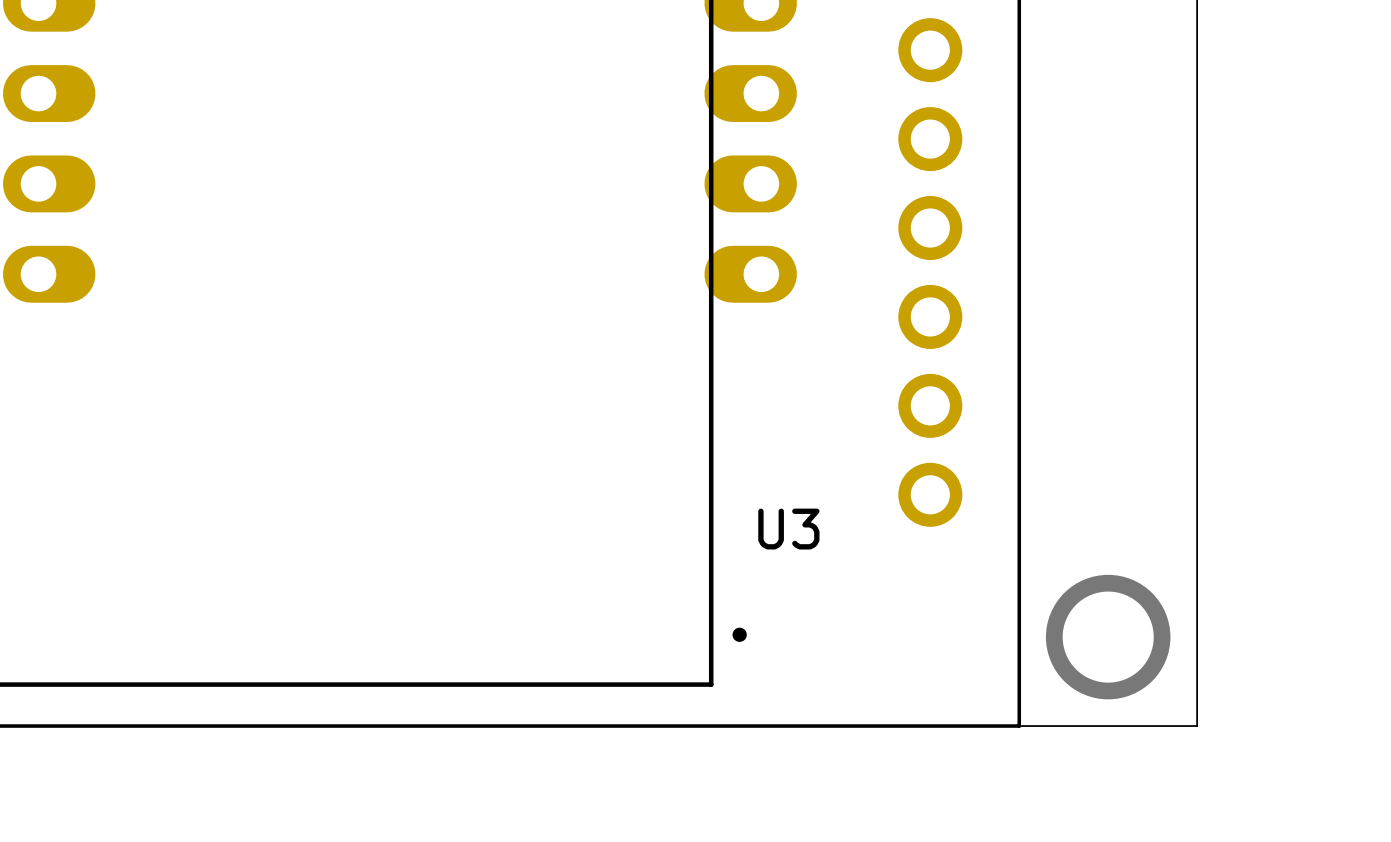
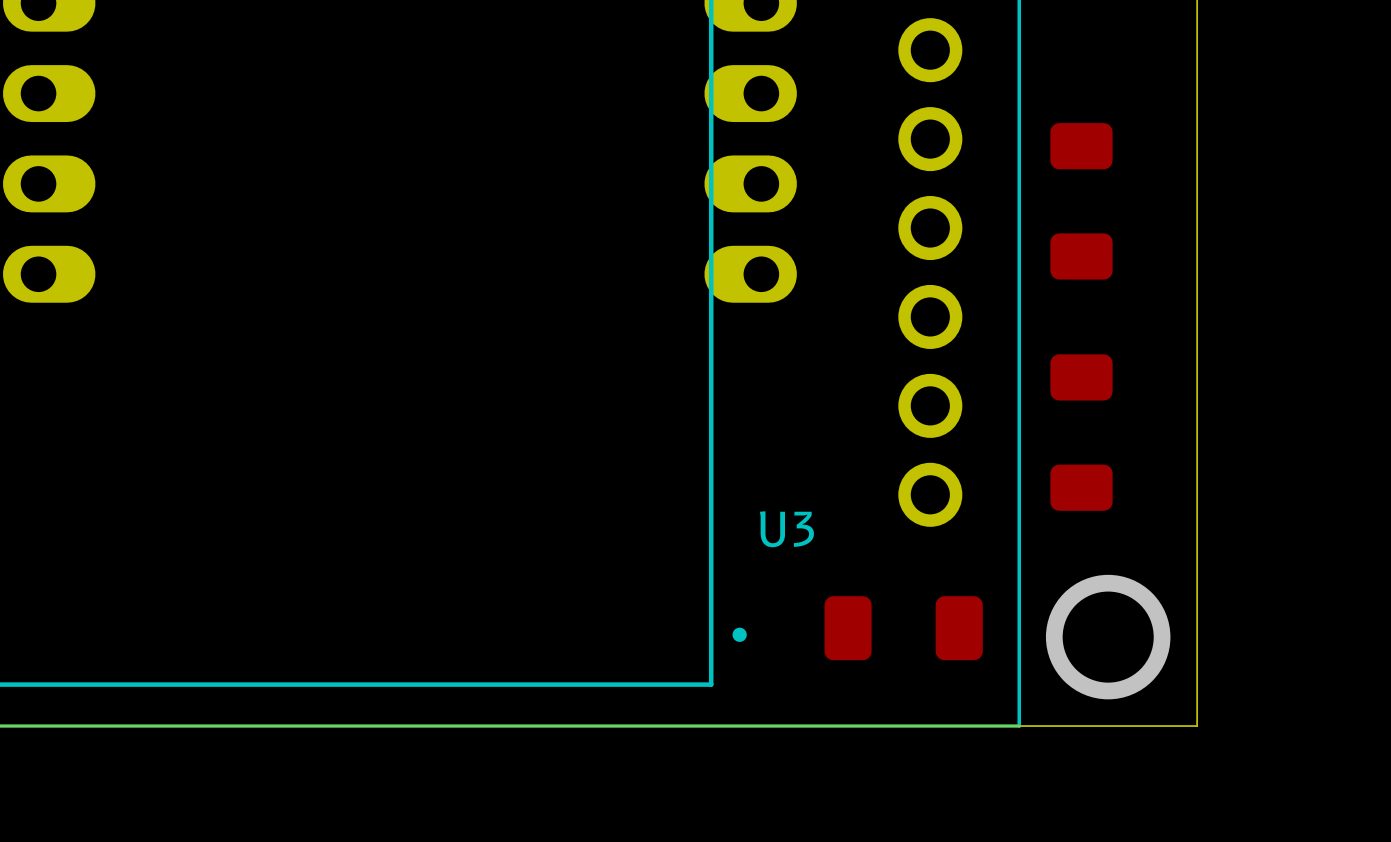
part: none -> (1081, 201)
part: none -> (1081, 432)
part: none -> (903, 628)

